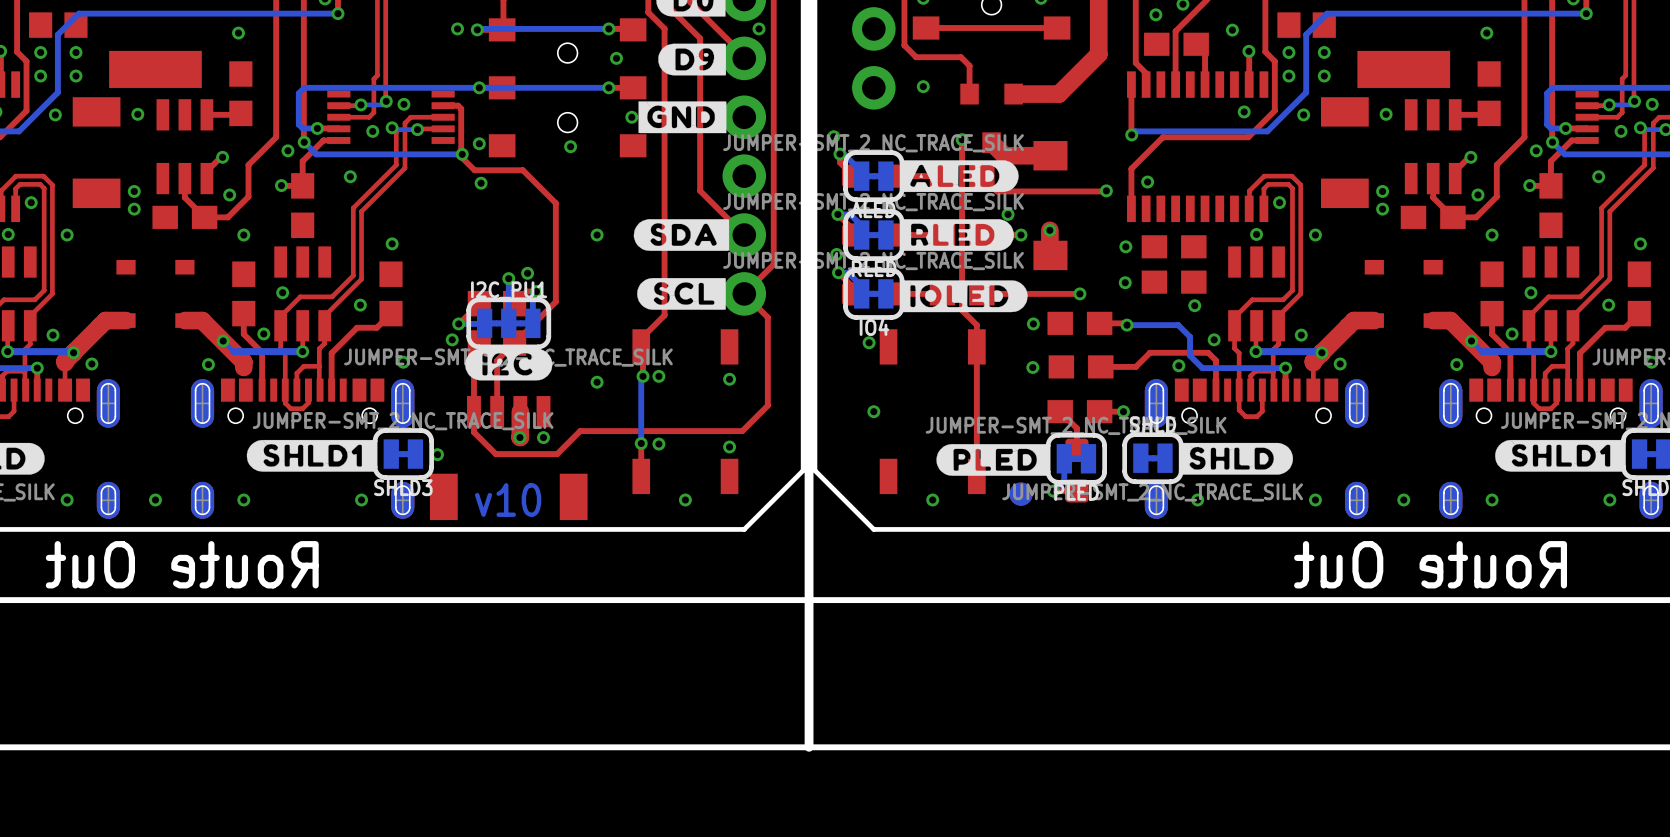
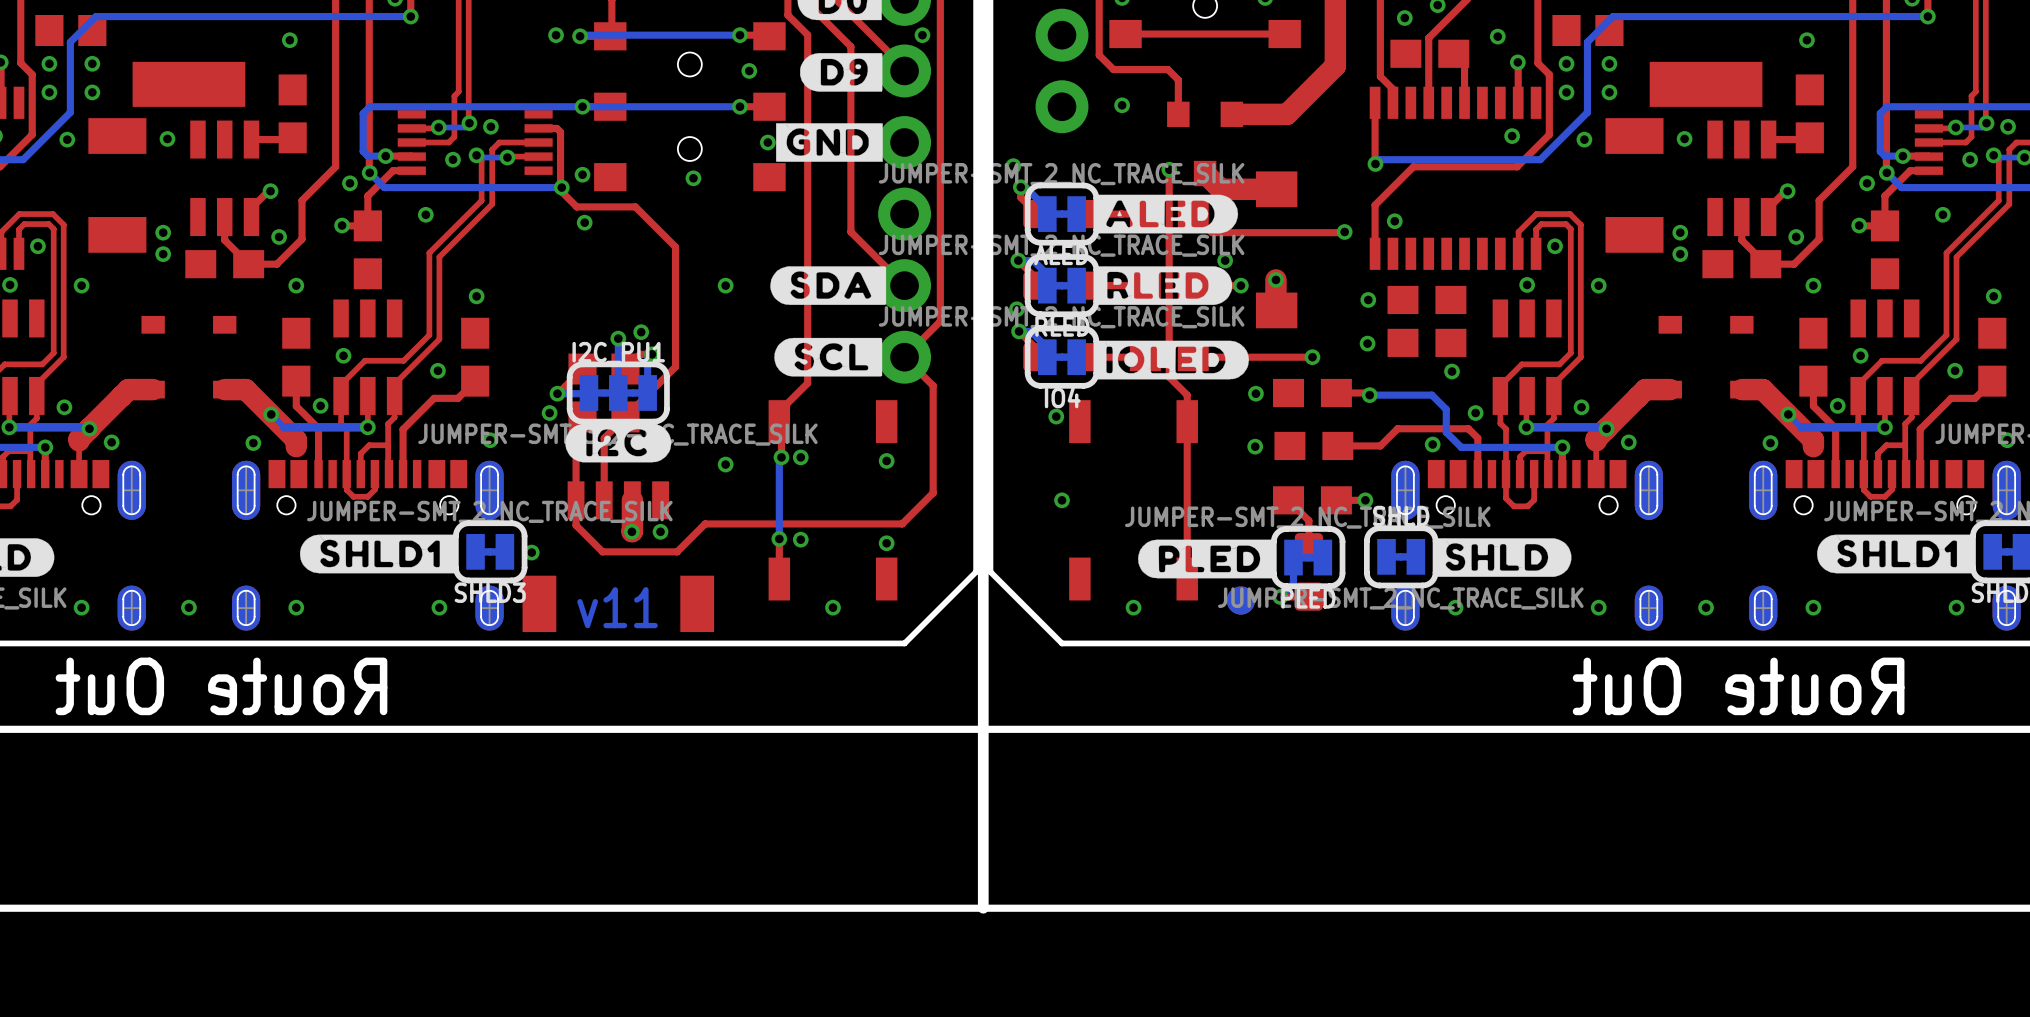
text: v10 (508, 500) -> v11 (617, 607)

